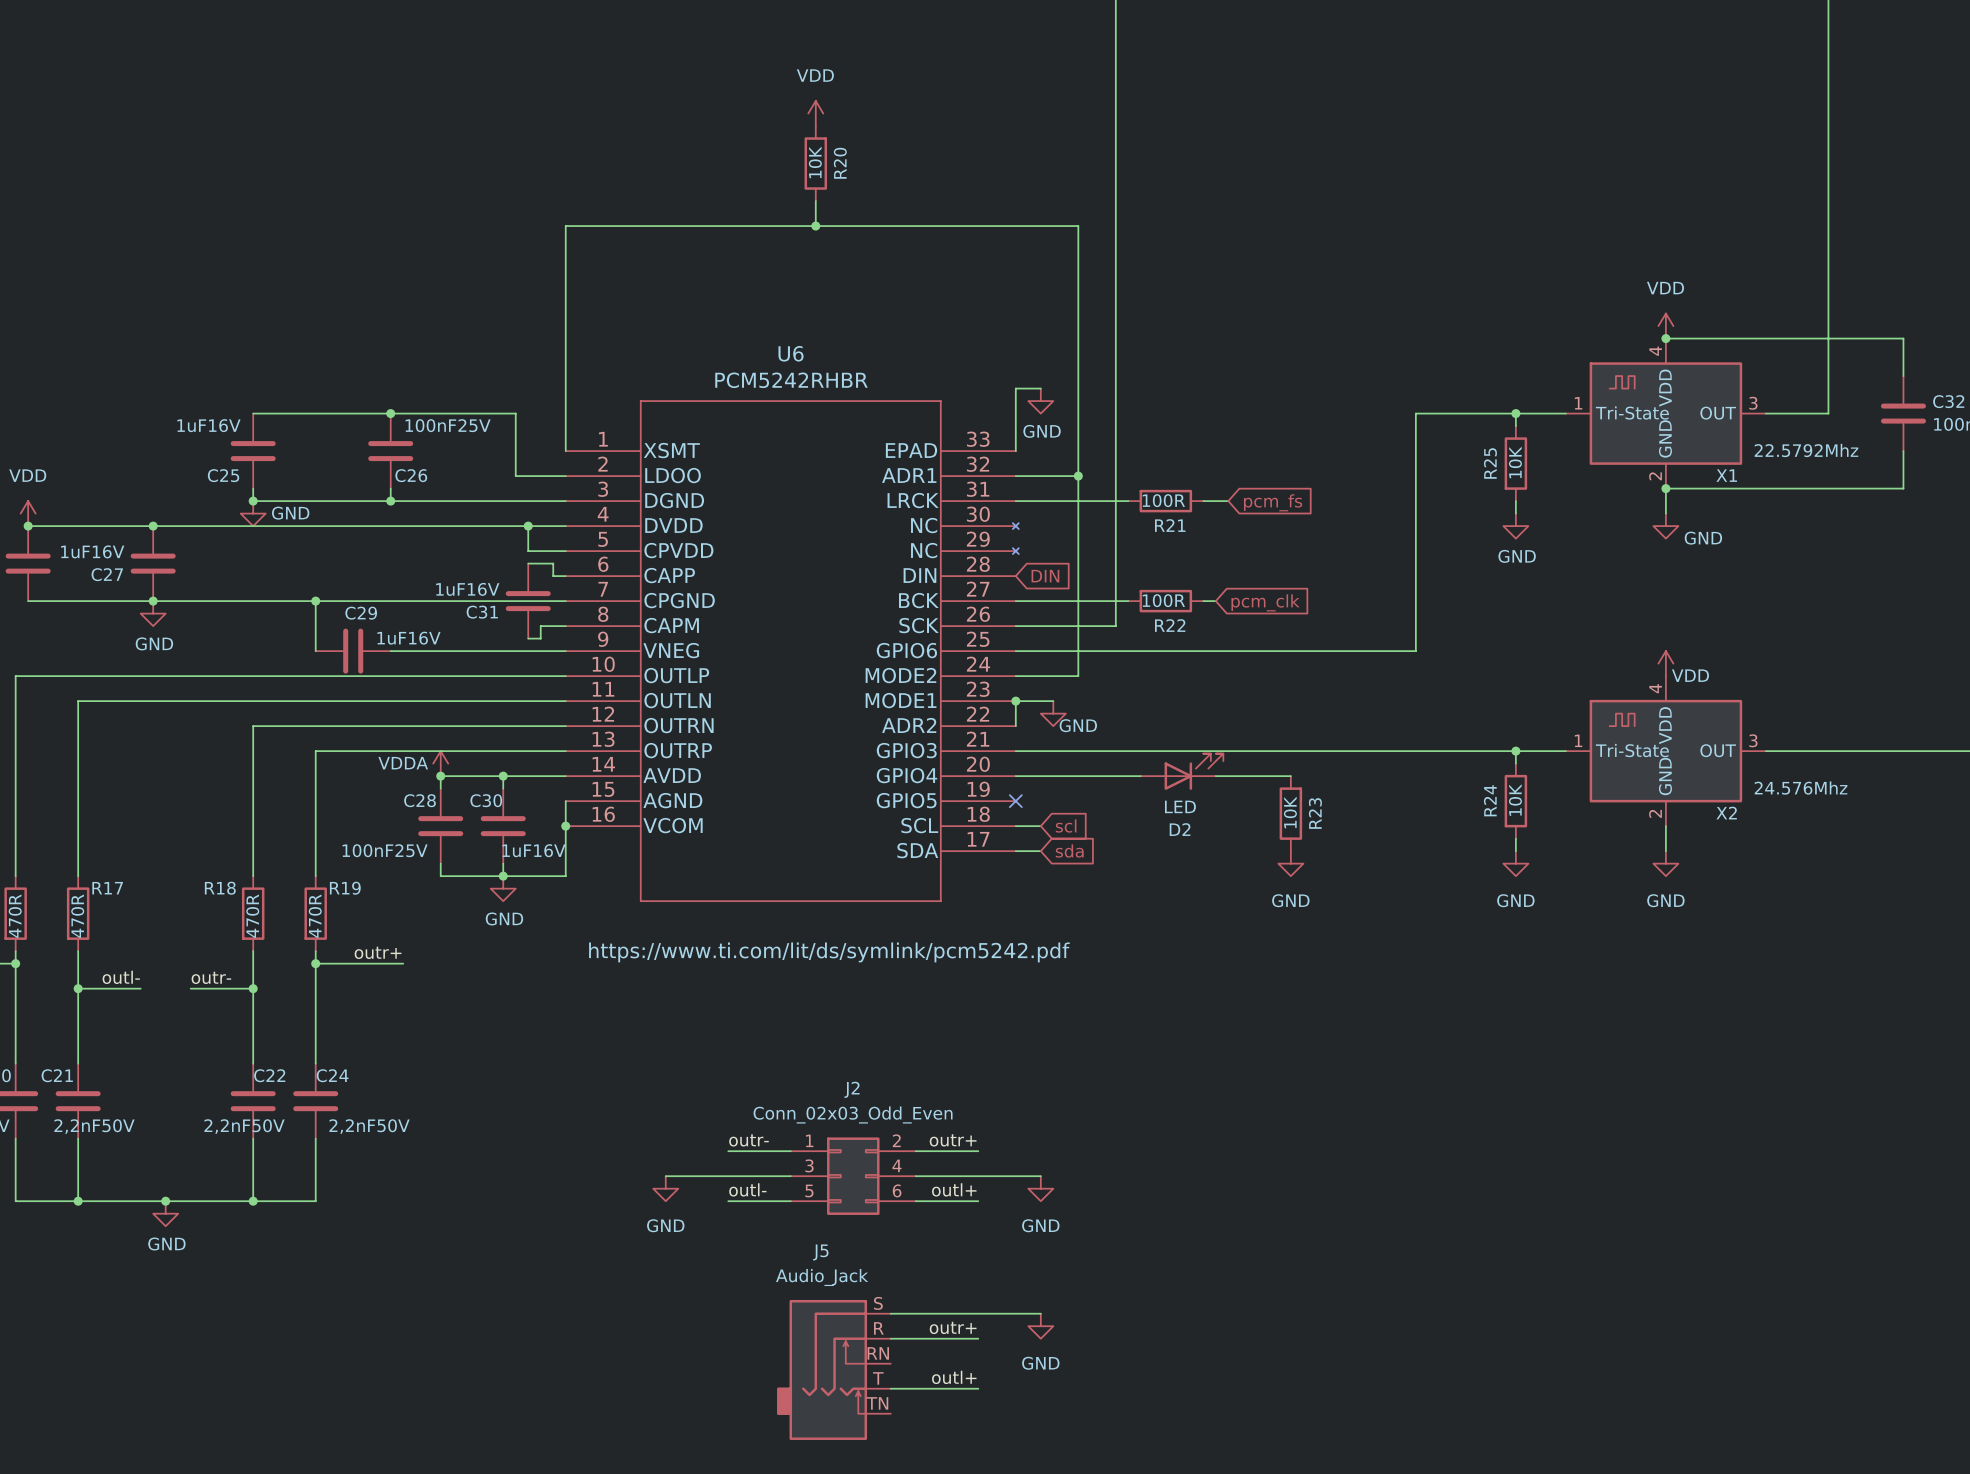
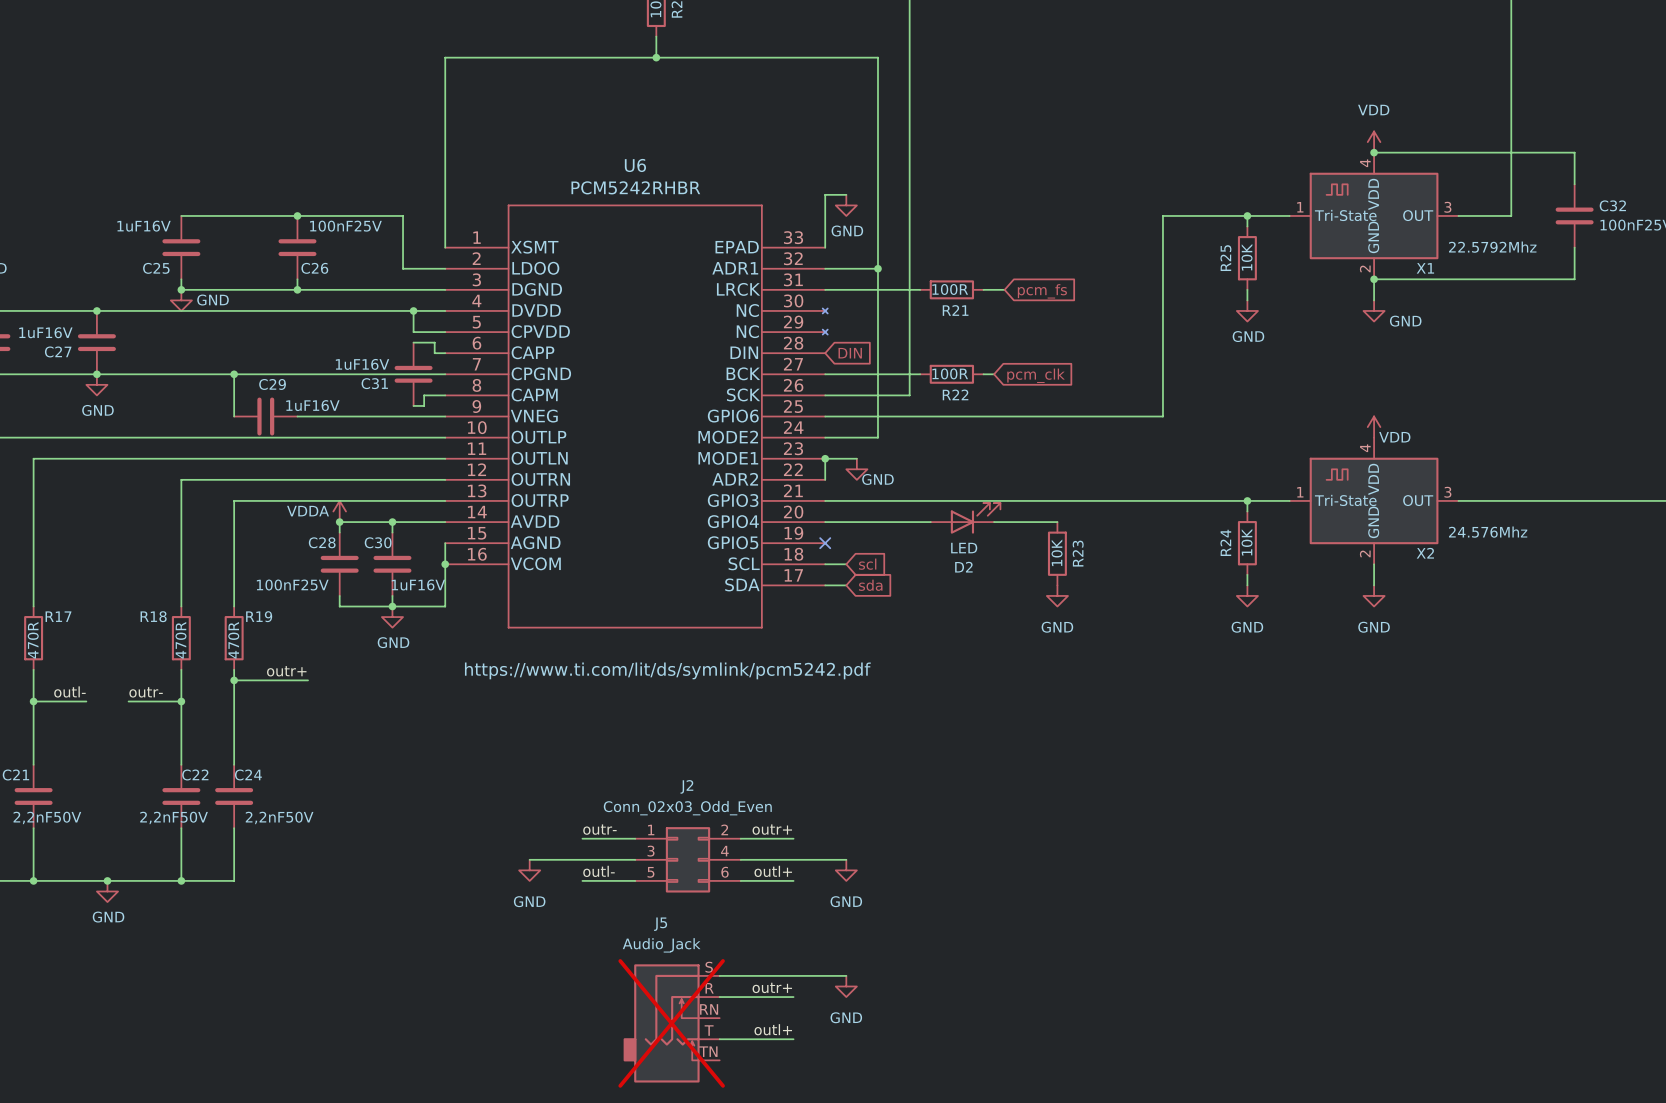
J5 do-not-place cross: none -> (671, 1023)

